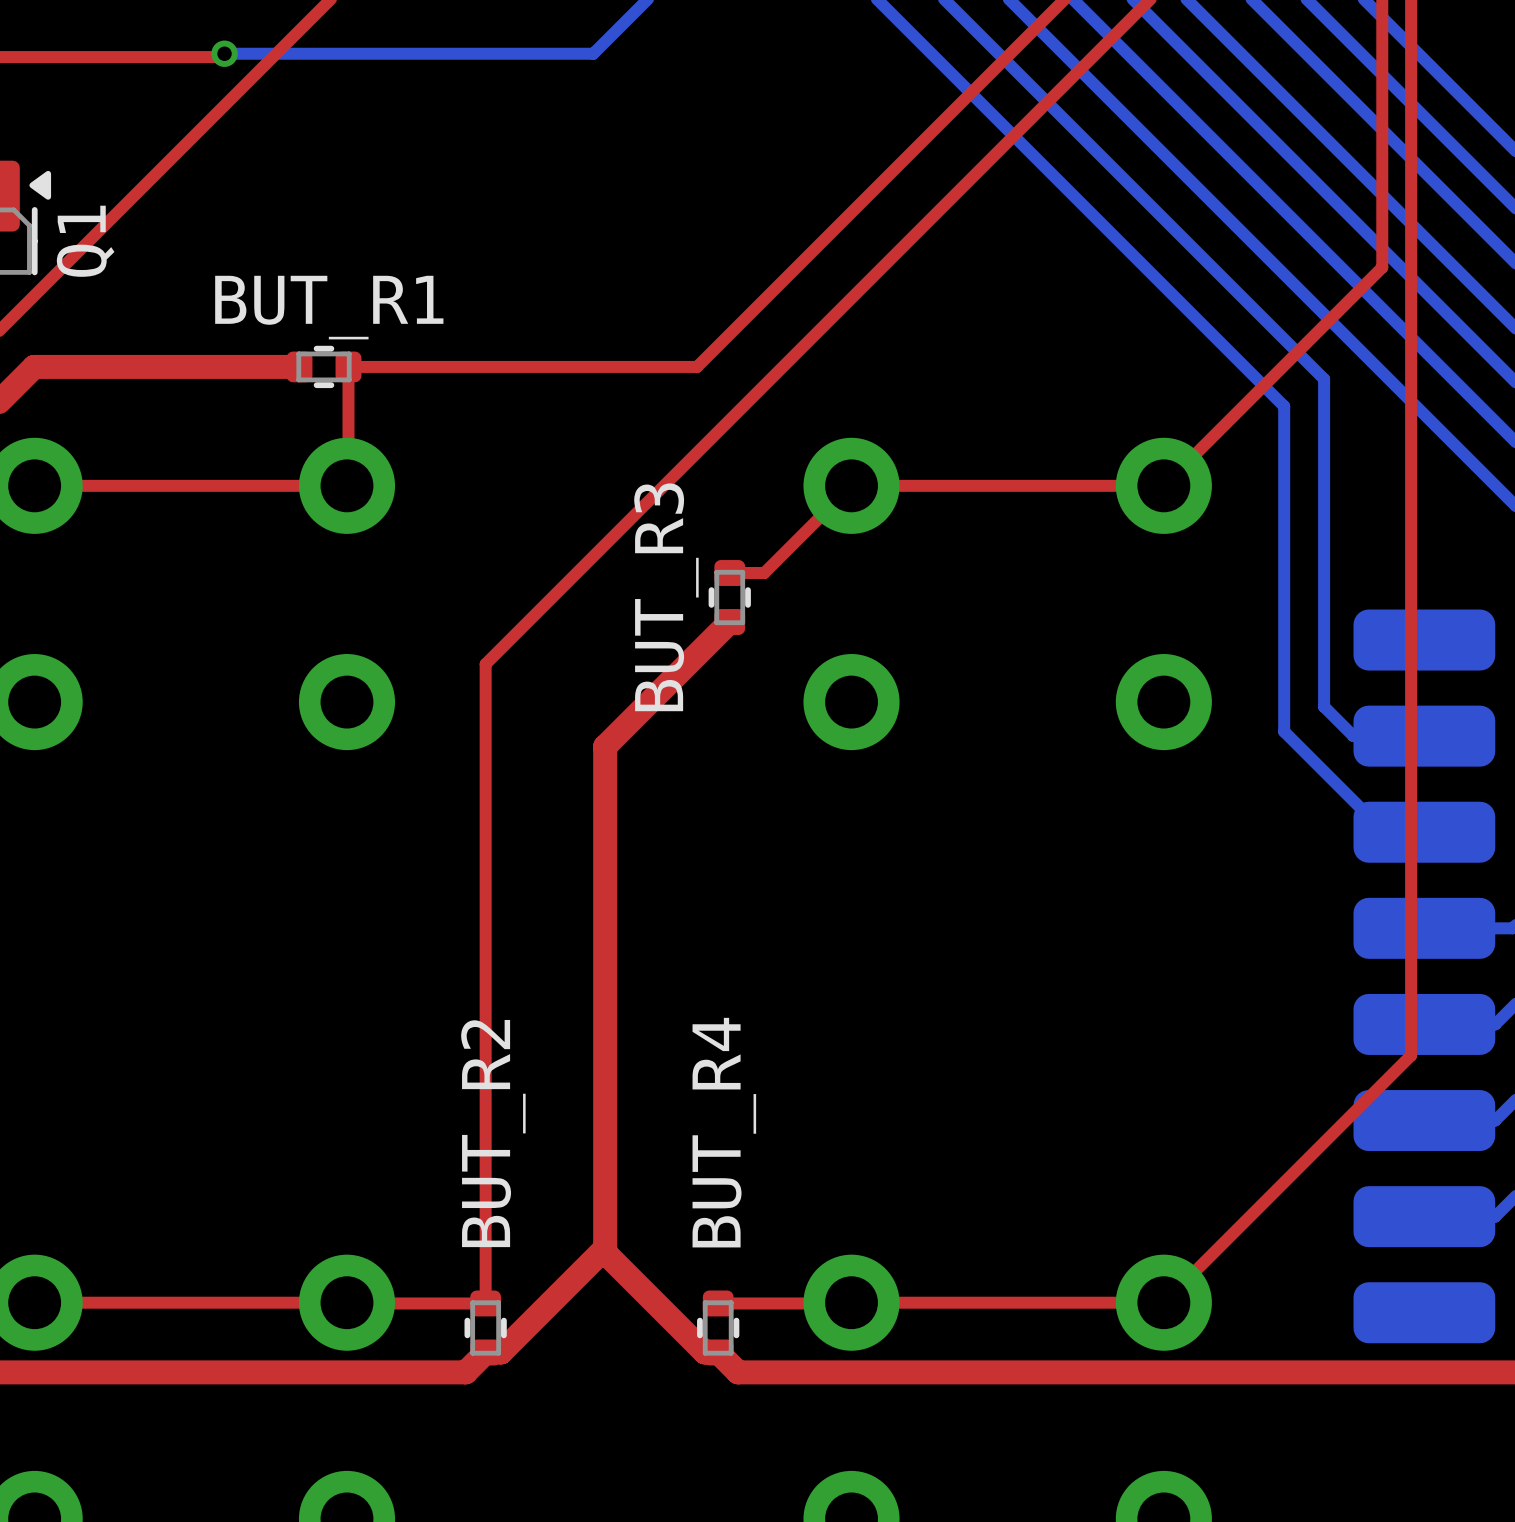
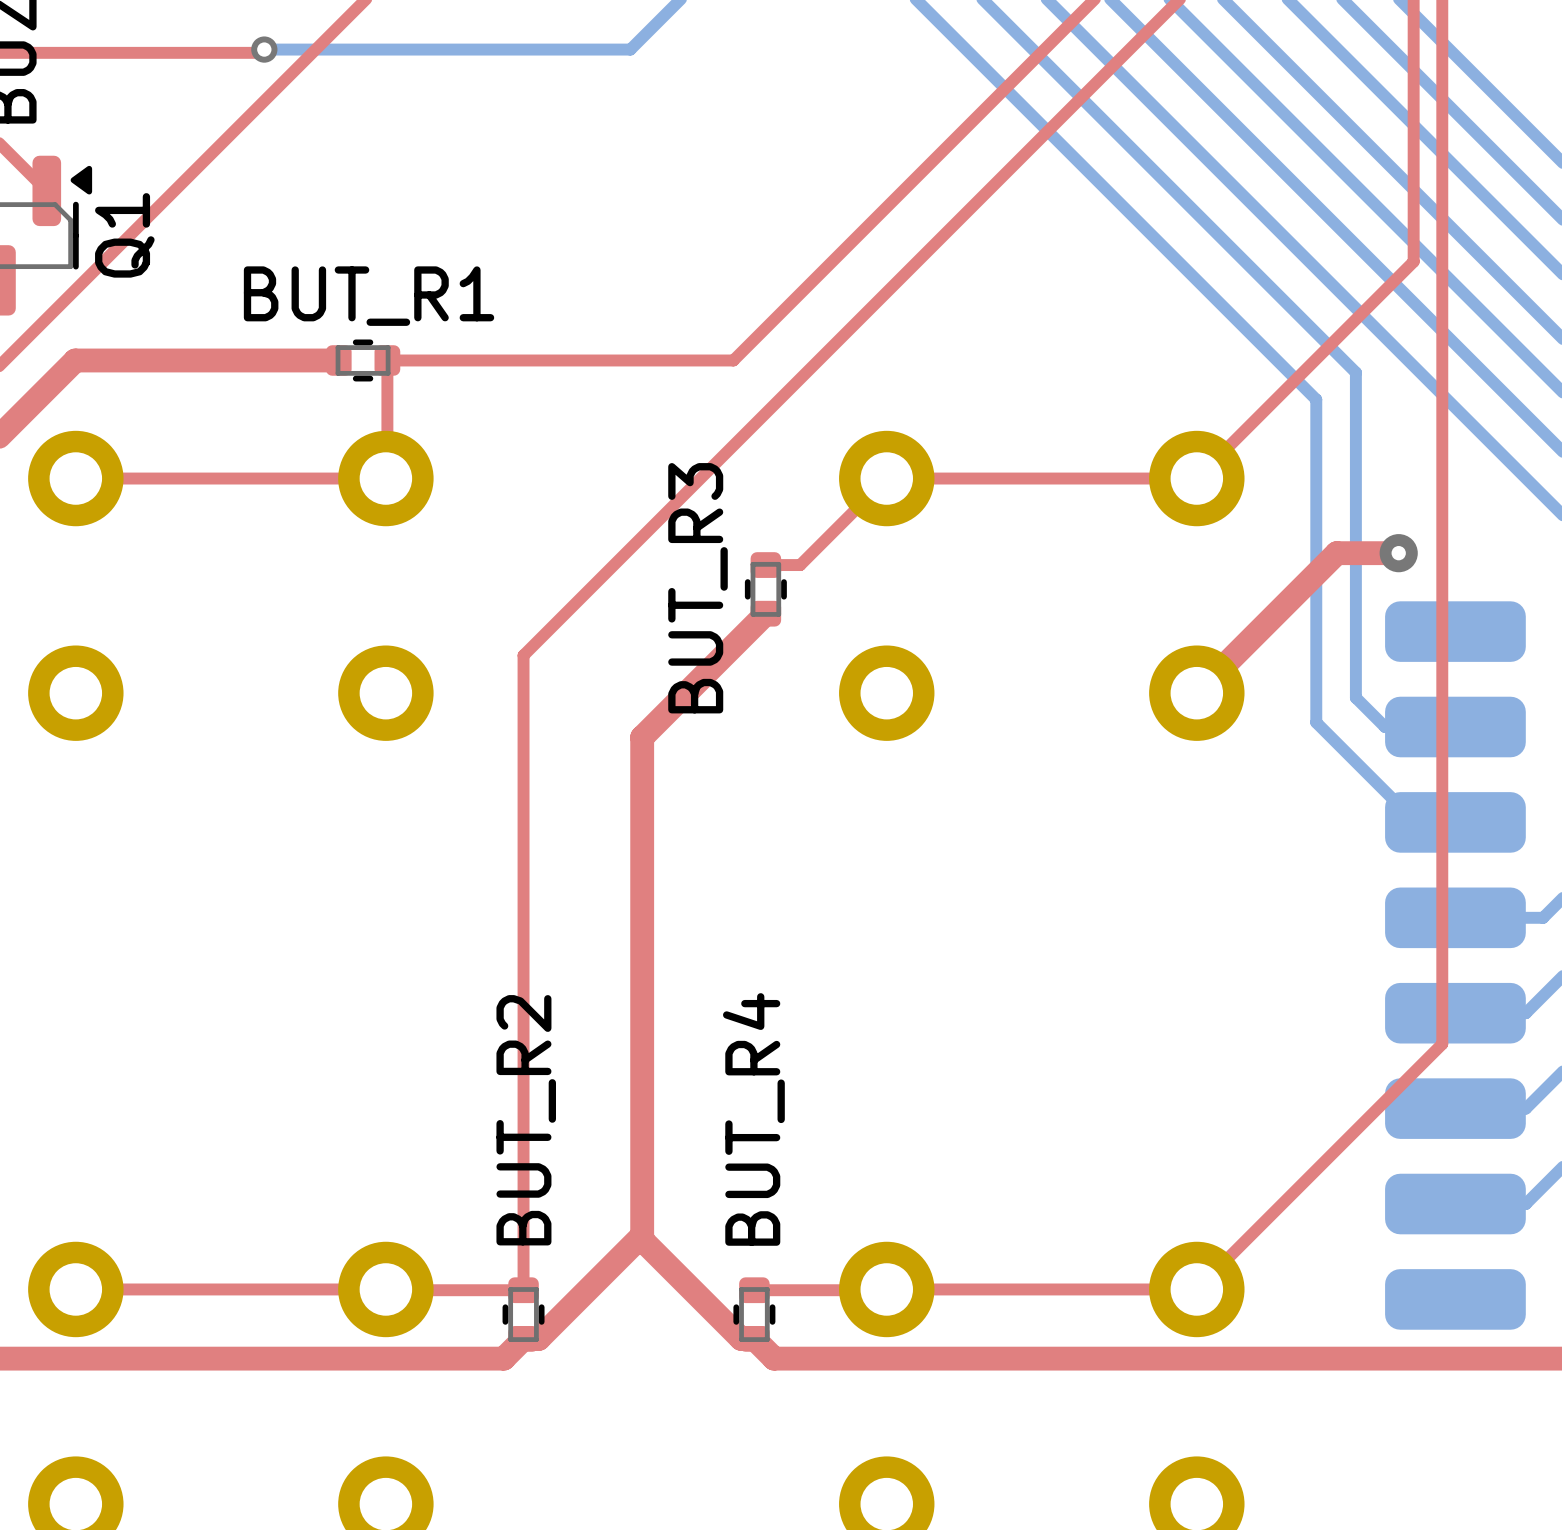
top track: none -> (1398, 553) (1336, 553) (1196, 693)
via: none -> (1398, 553)

